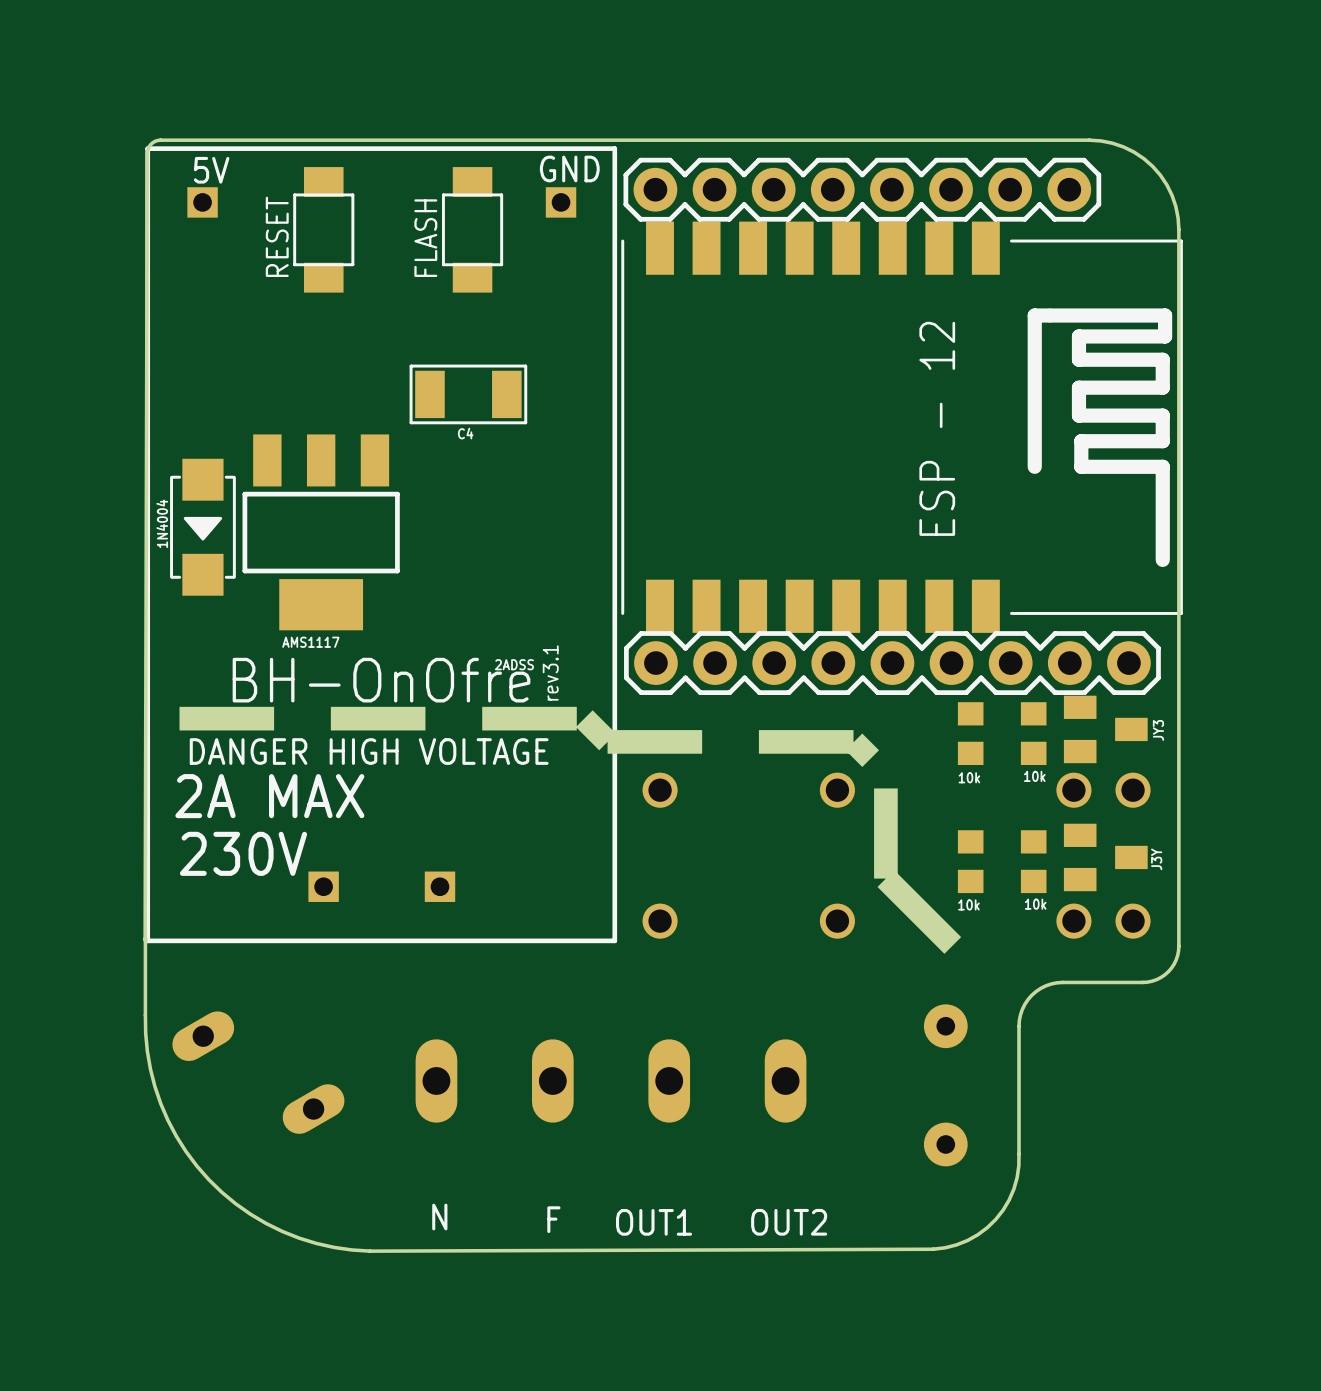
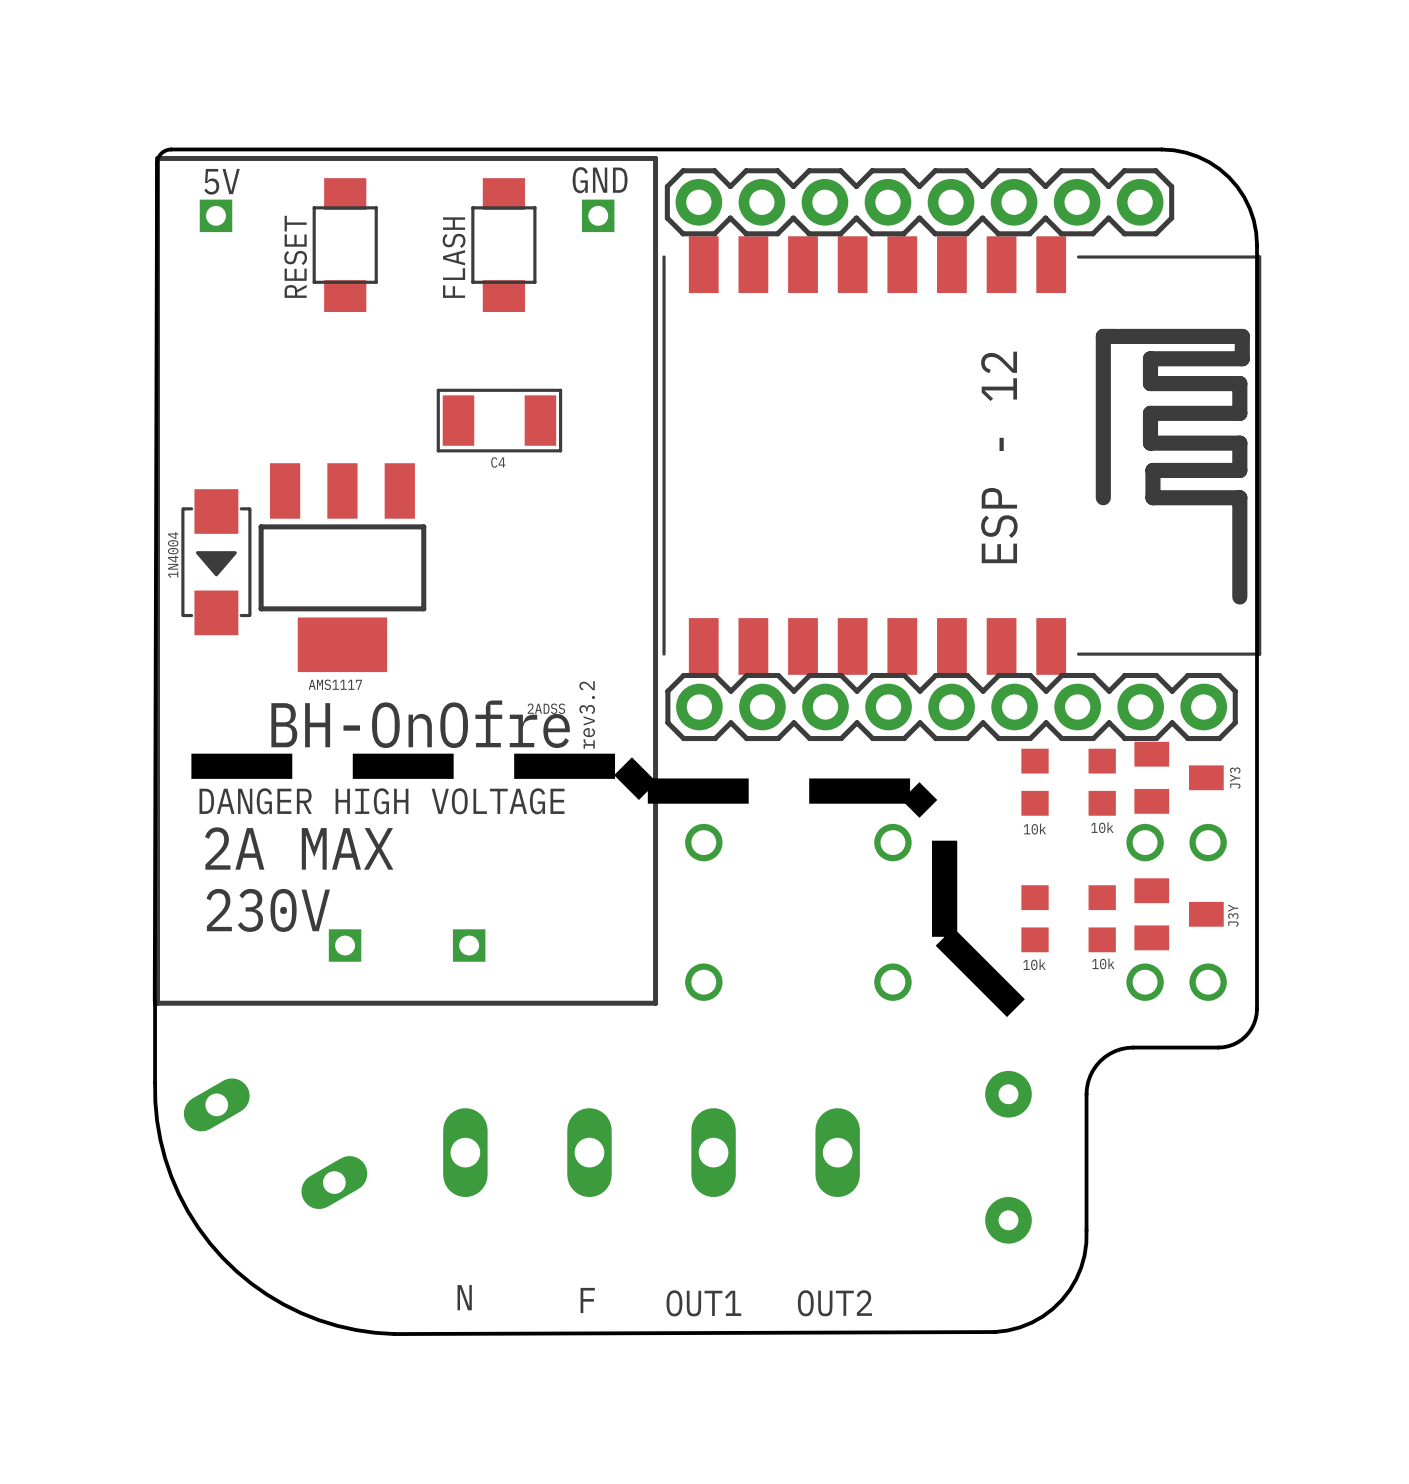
text: rev3.1 (550, 673) -> rev3.2 (587, 714)

